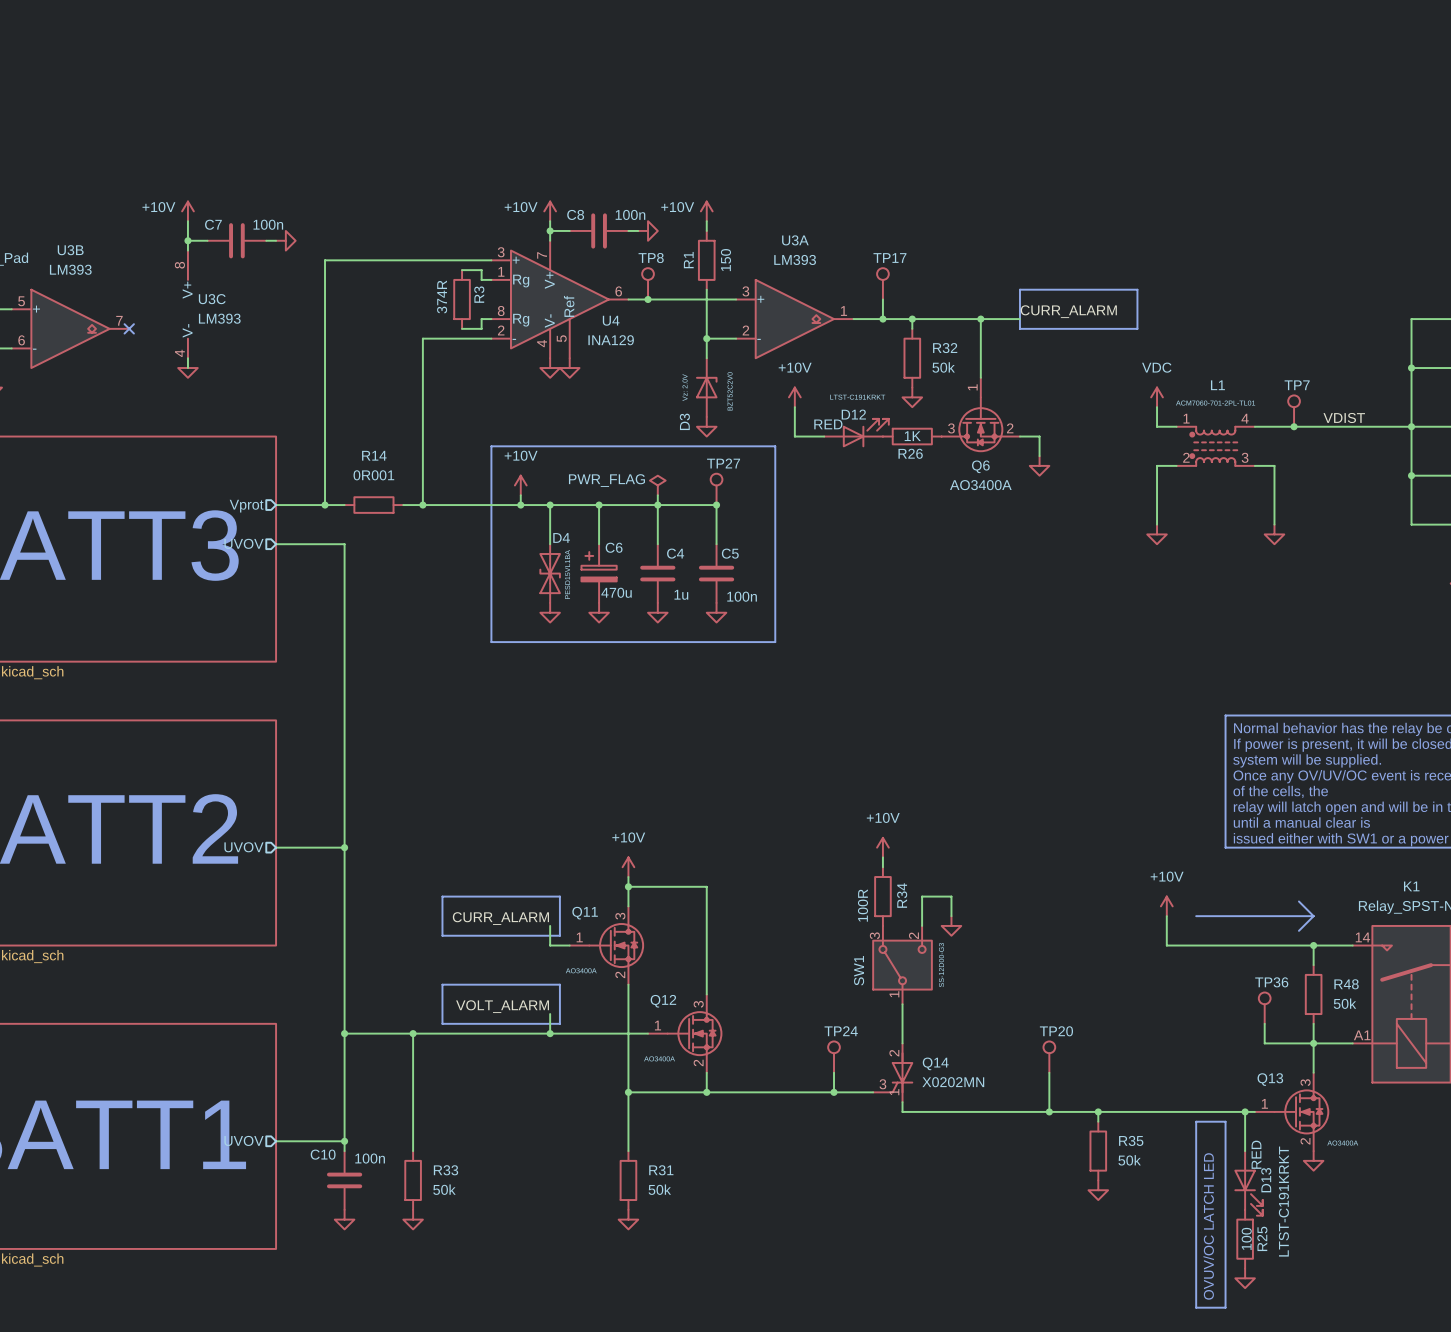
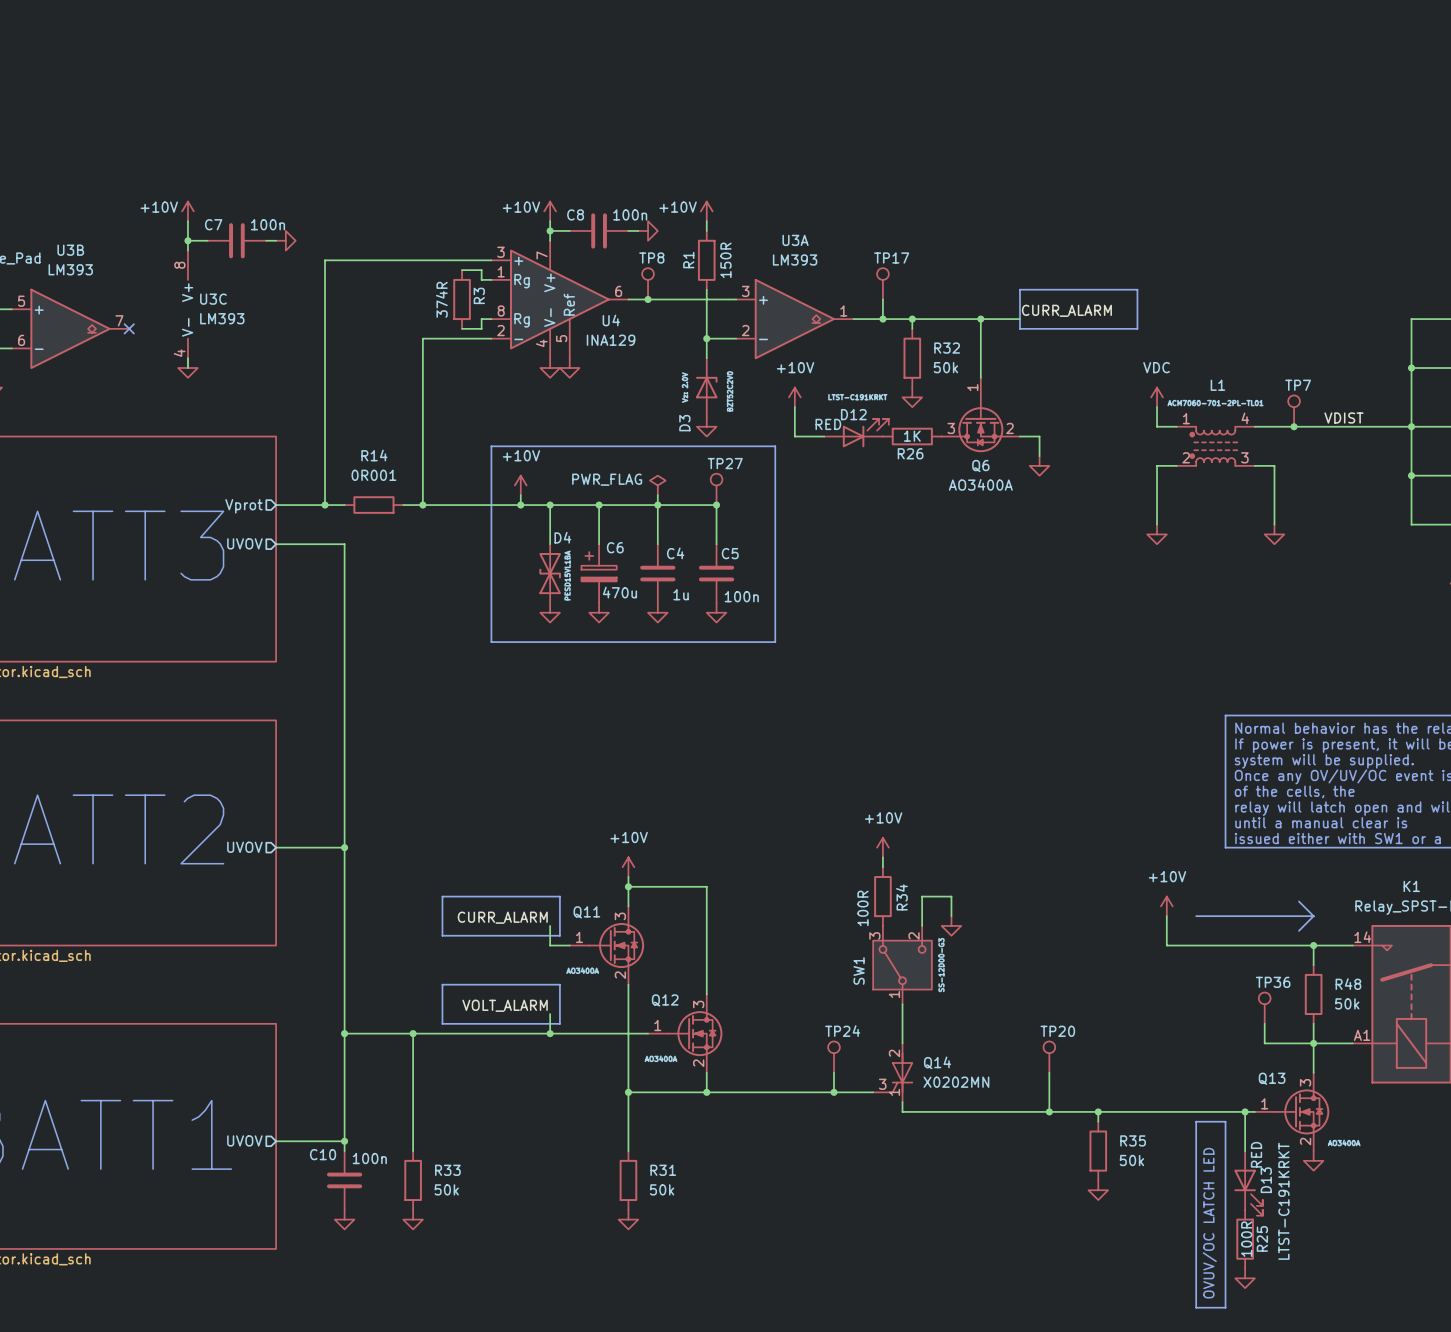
R1 value: 150 (725, 260) -> 150R (725, 260)
R25 value: 100 (1246, 1238) -> 100R (1246, 1239)

